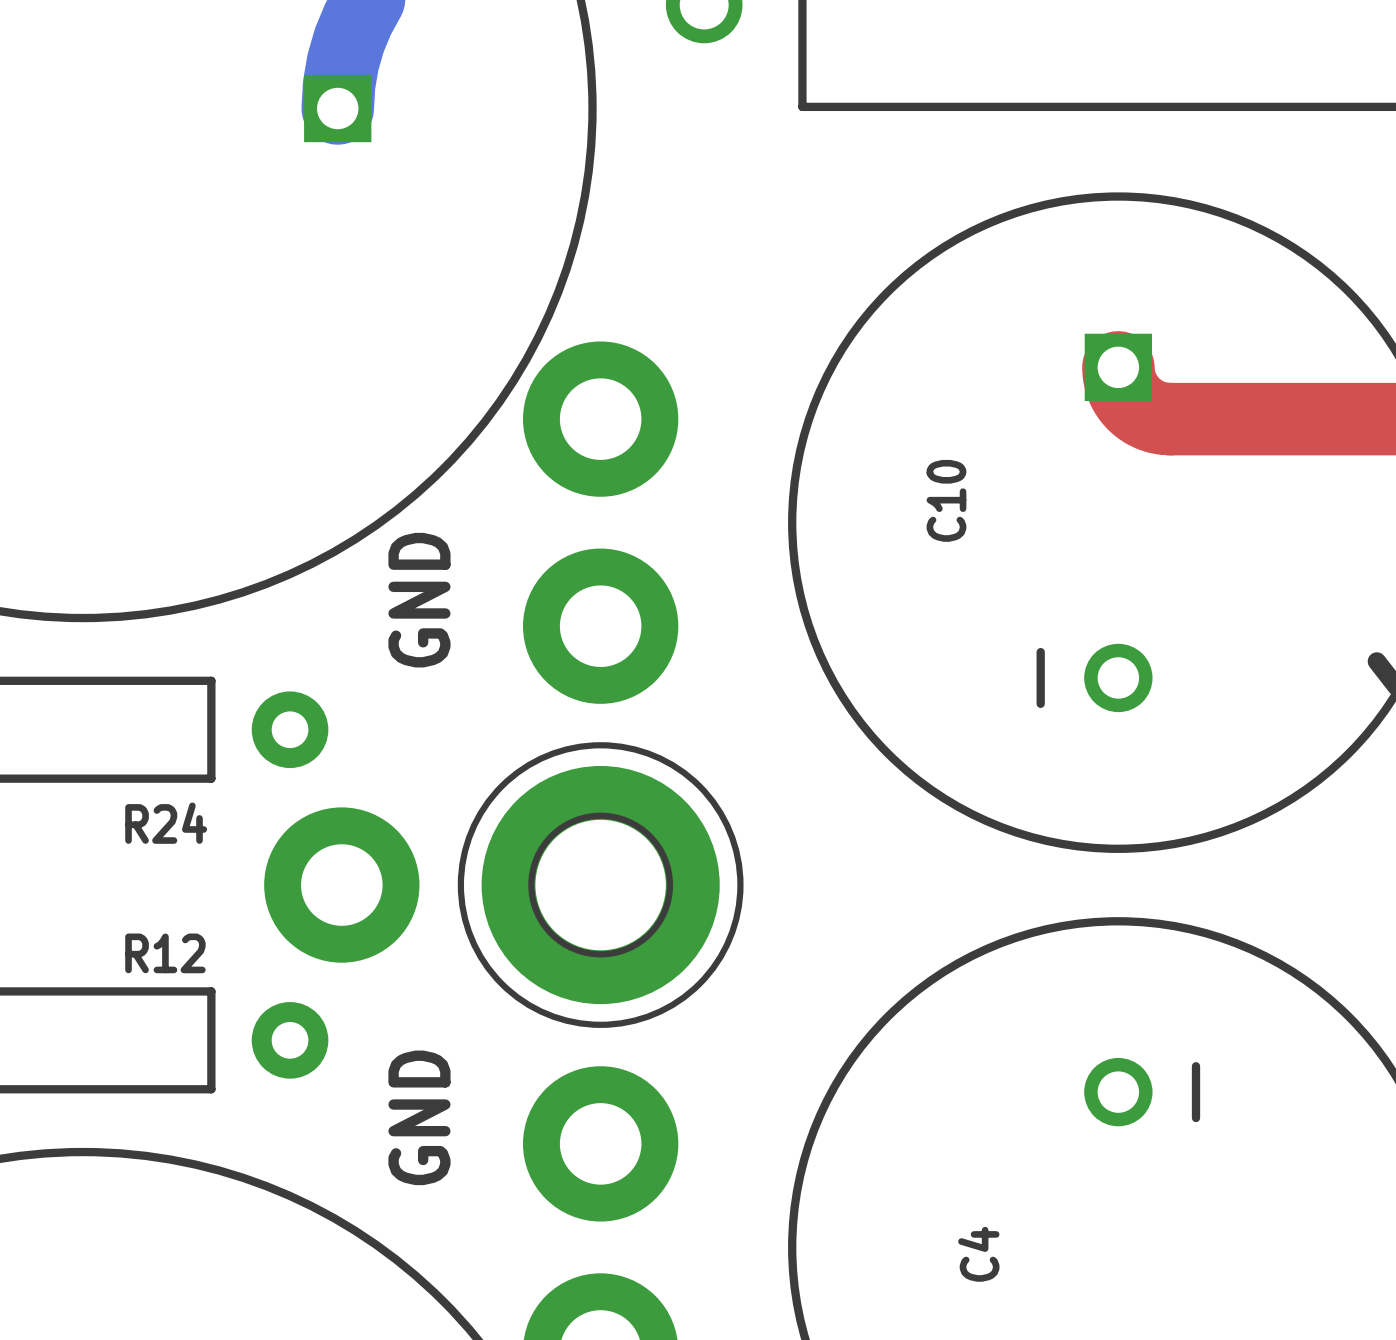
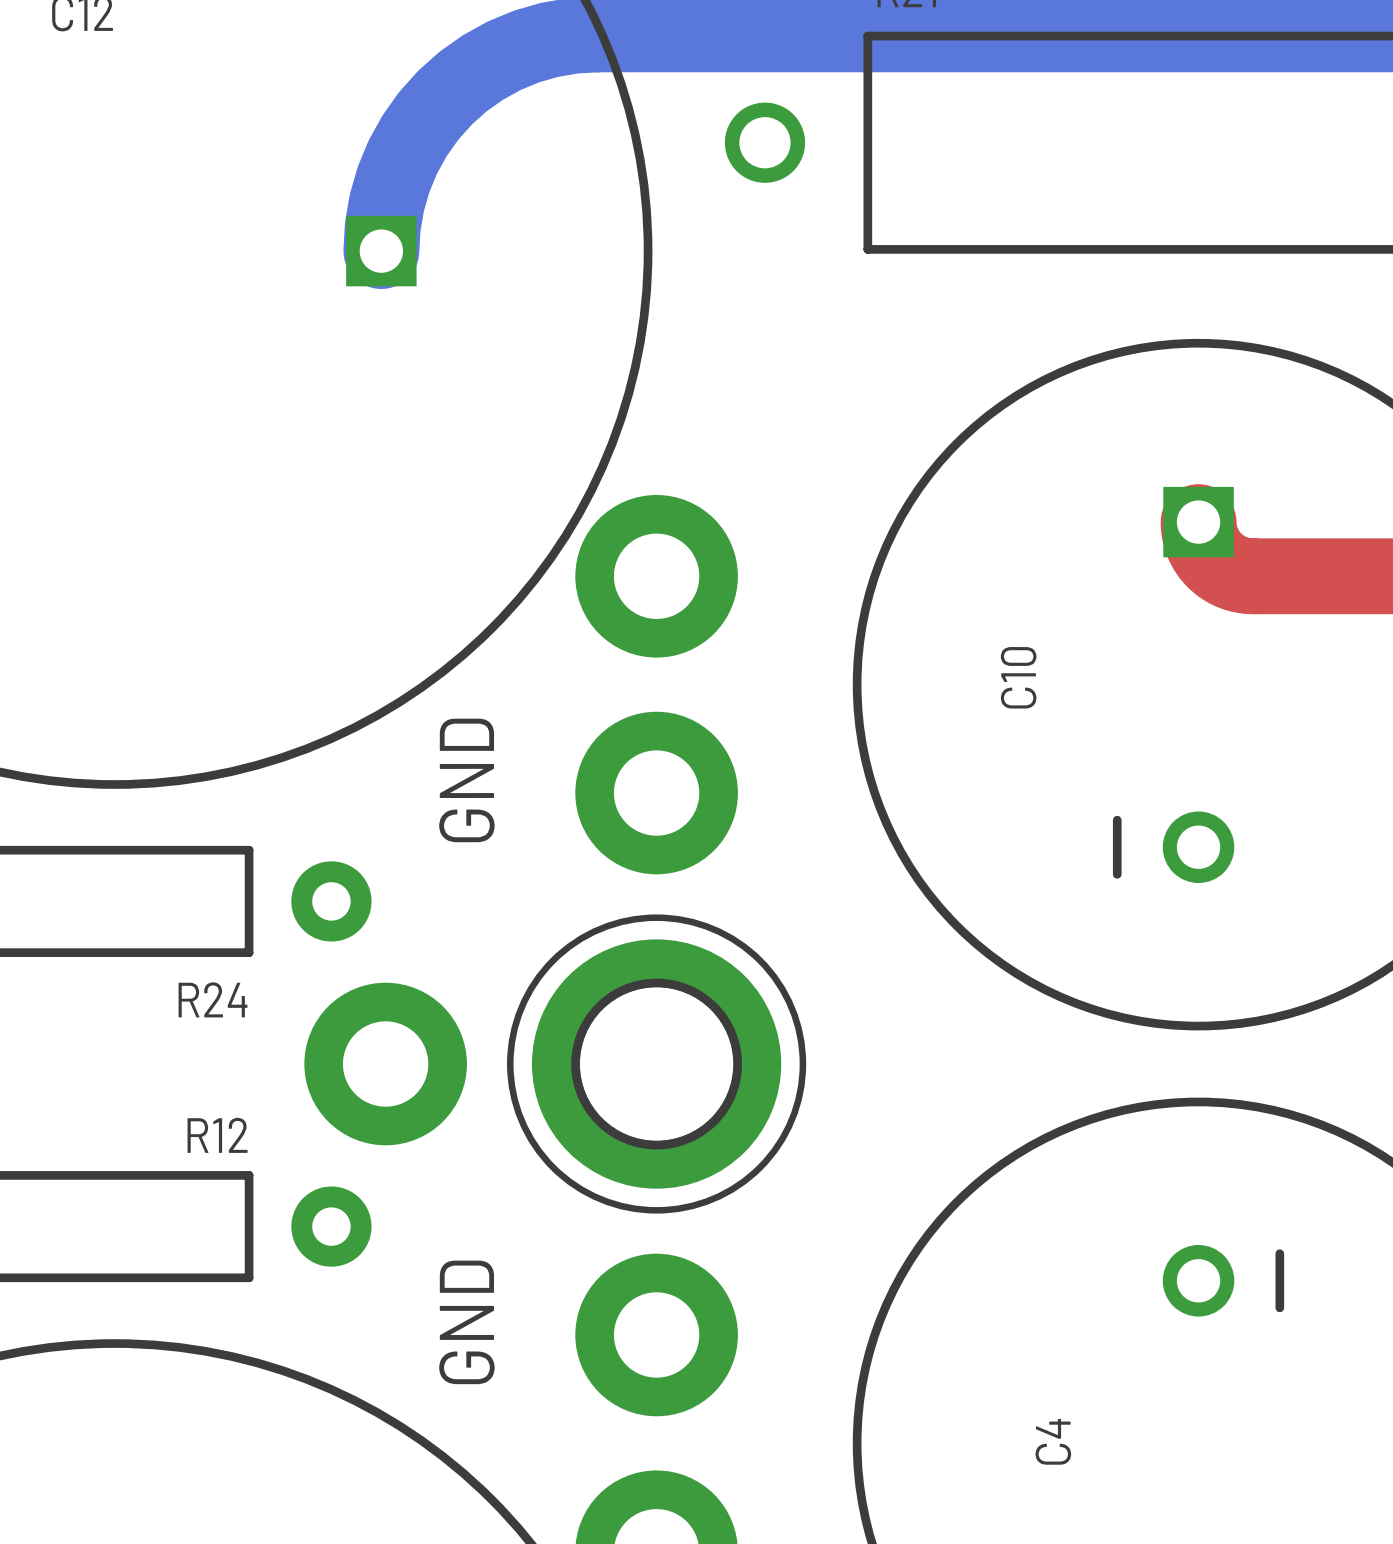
part footprint: [457, 742, 744, 1028] -> [507, 914, 807, 1214]

